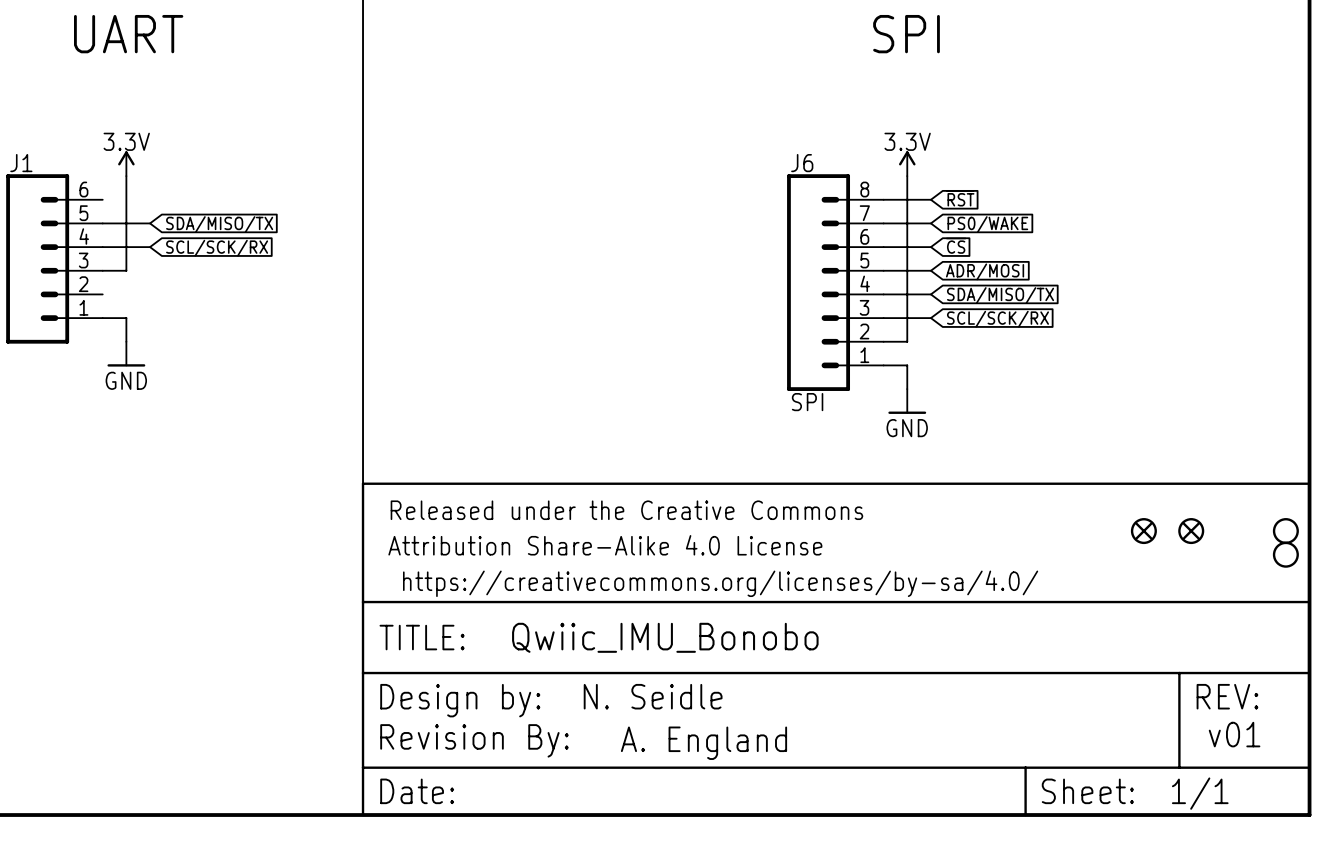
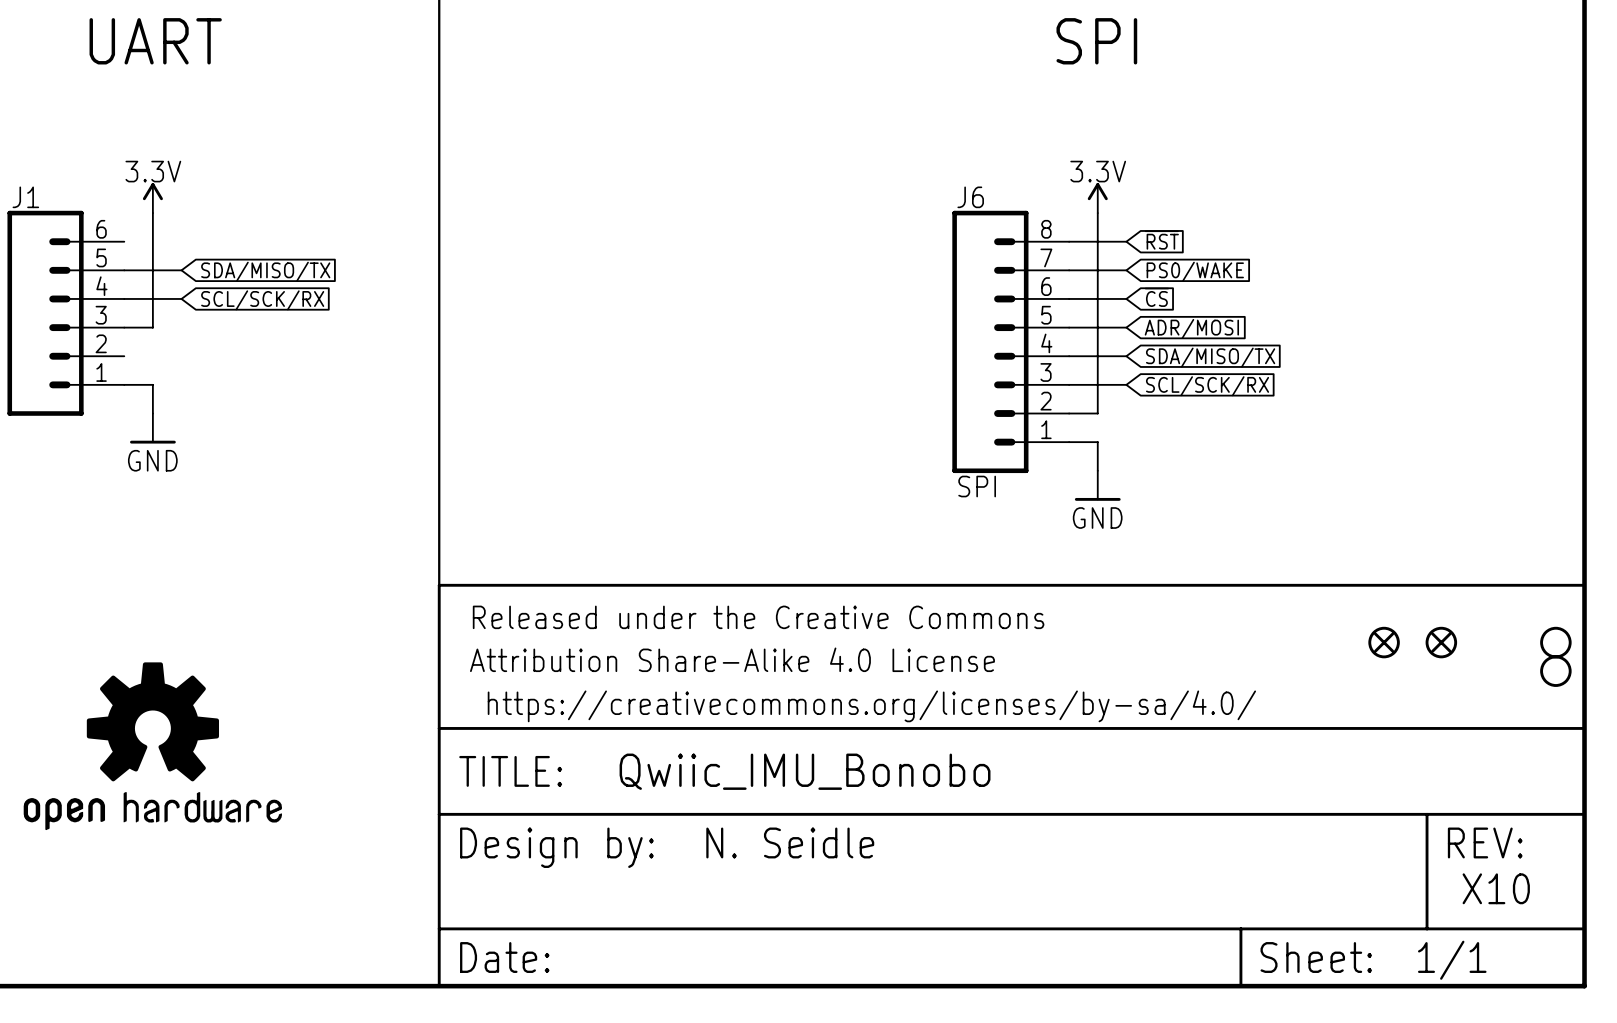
part: none -> (152, 746)
text: v01 (1234, 734) -> X10 (1496, 888)
part: (474, 740) -> none
text: A. England (704, 743) -> none

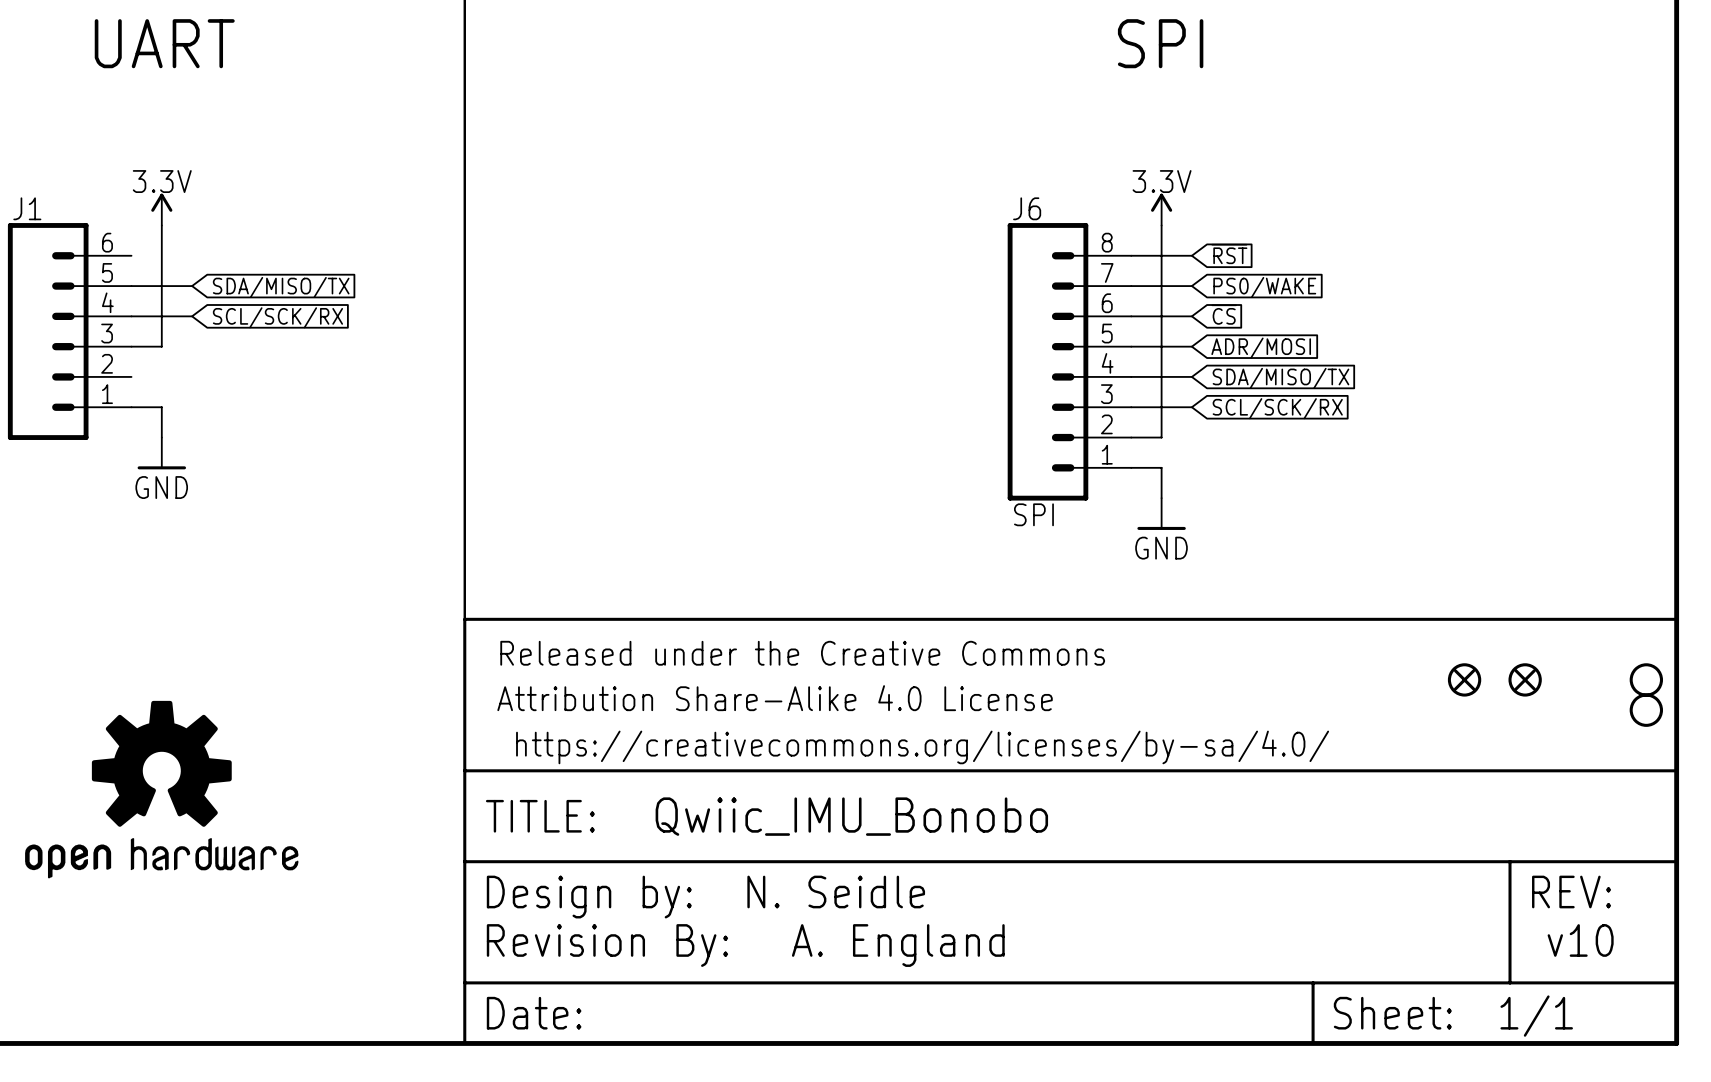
text: X10 (1496, 888) -> v10 (1580, 940)
part: none -> (607, 945)
text: none -> A. England (898, 945)

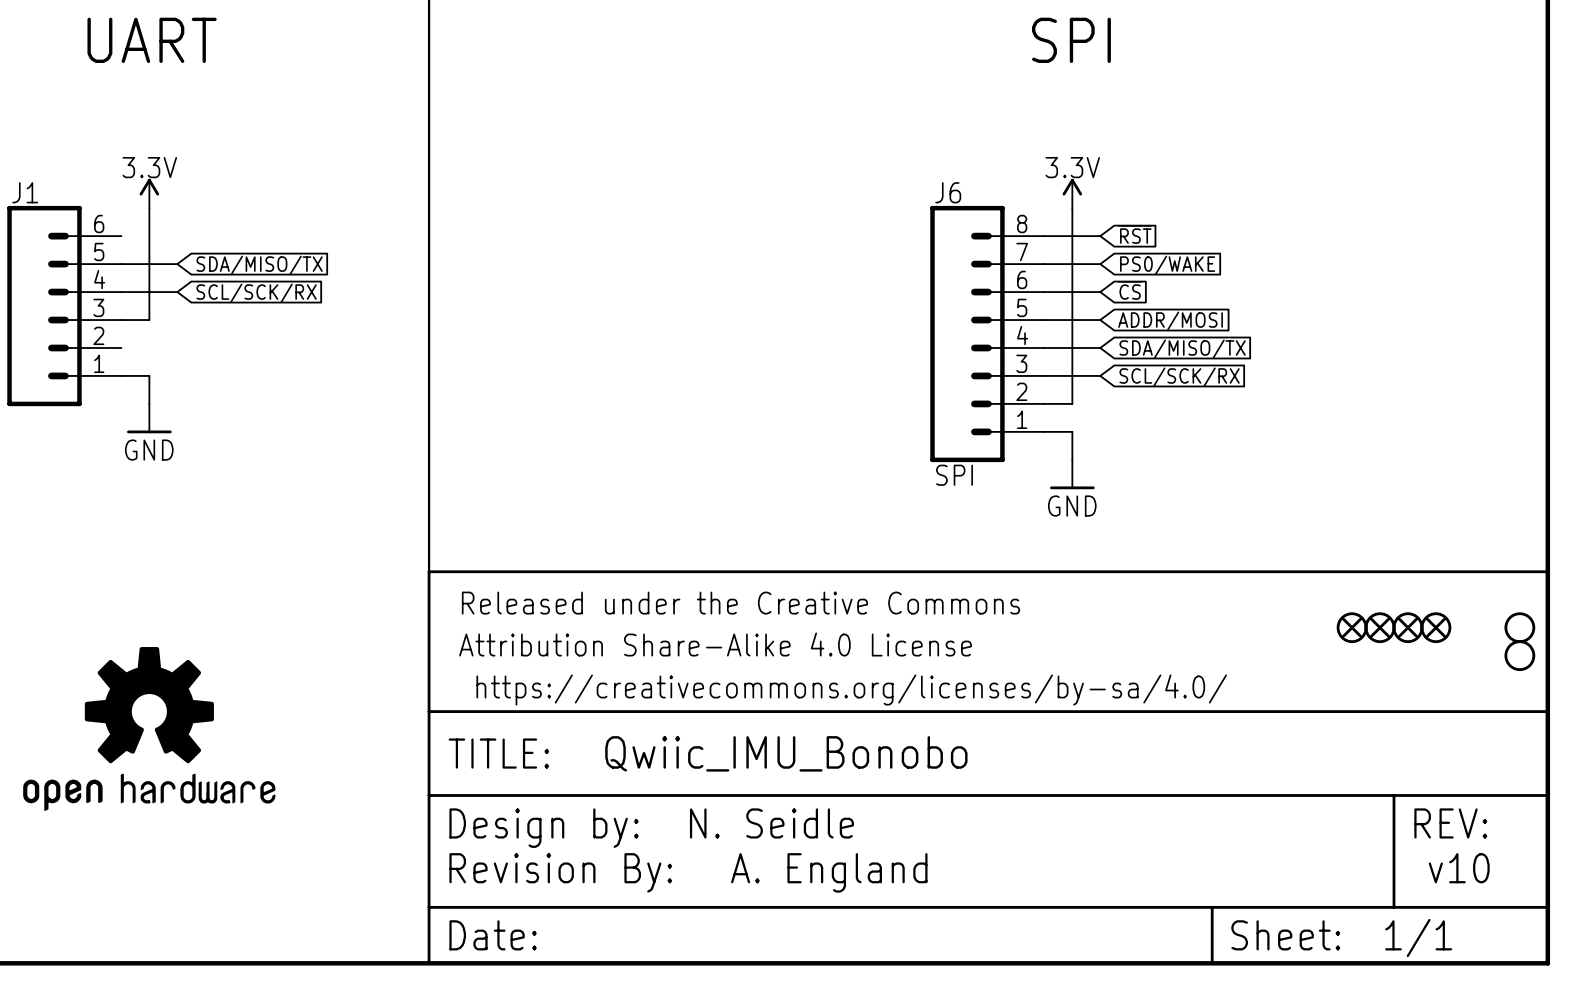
global label: ADR/MOSI (1261, 348) -> ADDR/MOSI (1170, 321)
part: none -> (1380, 627)
part: none -> (1435, 627)

